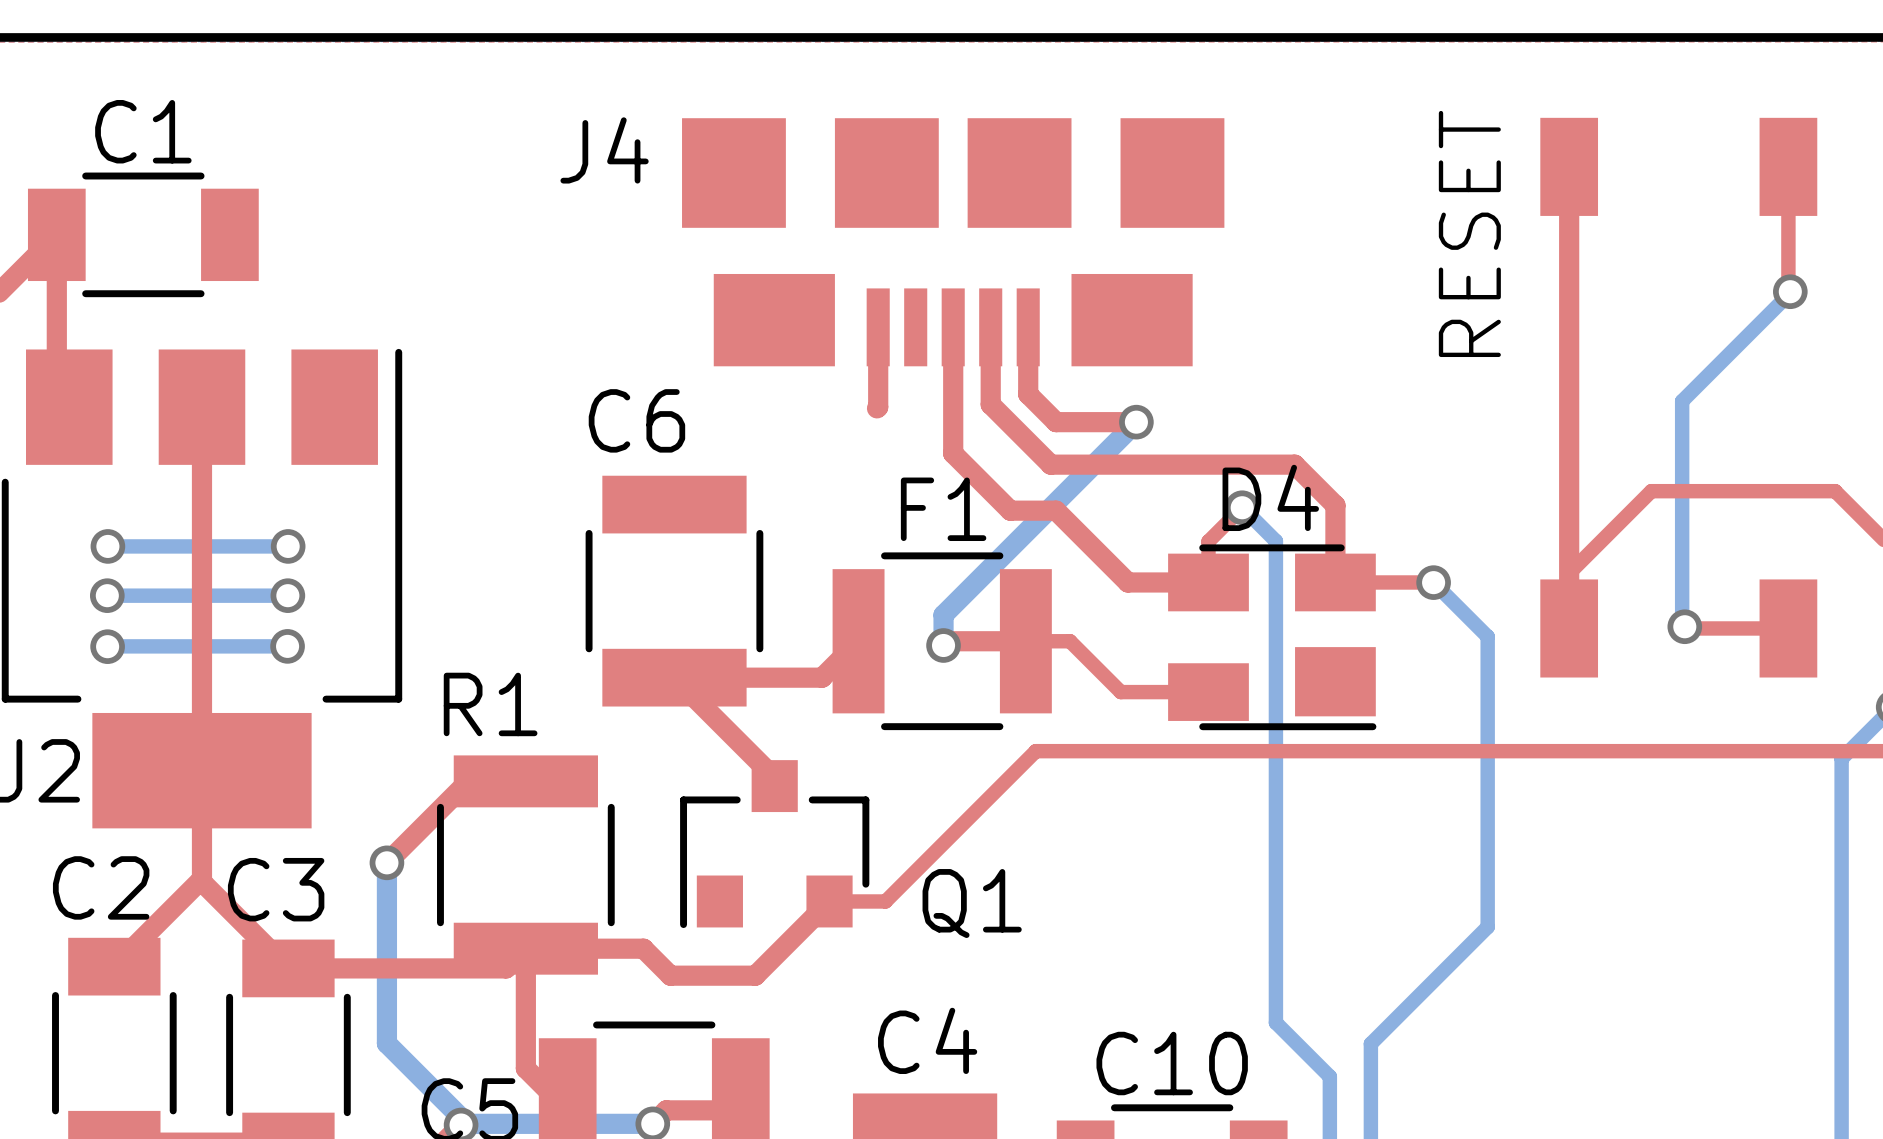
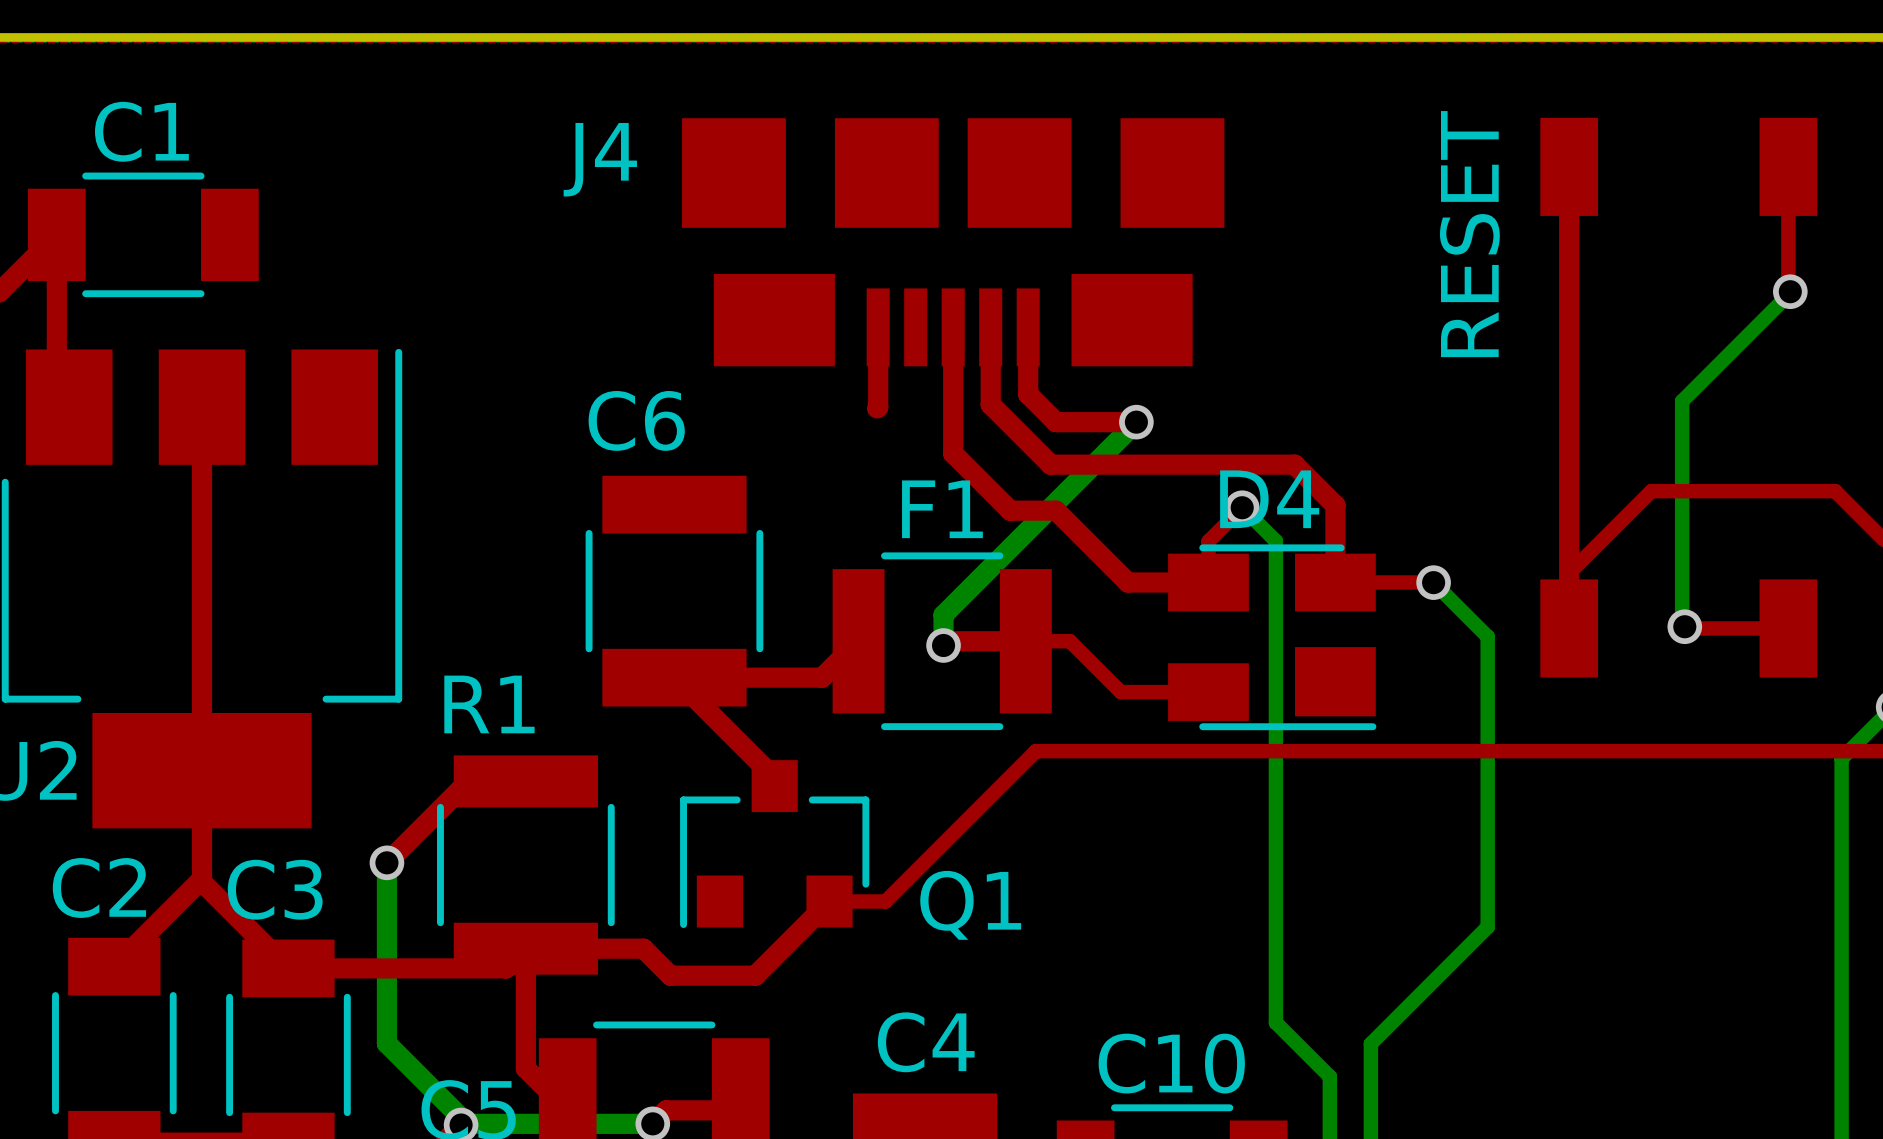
bottom track: (107, 546) (288, 546) -> none
via: (107, 546) -> none
via: (288, 546) -> none
bottom track: (107, 595) (287, 595) -> none
via: (107, 595) -> none
via: (287, 595) -> none
bottom track: (107, 646) (287, 646) -> none
via: (107, 646) -> none
via: (287, 646) -> none

